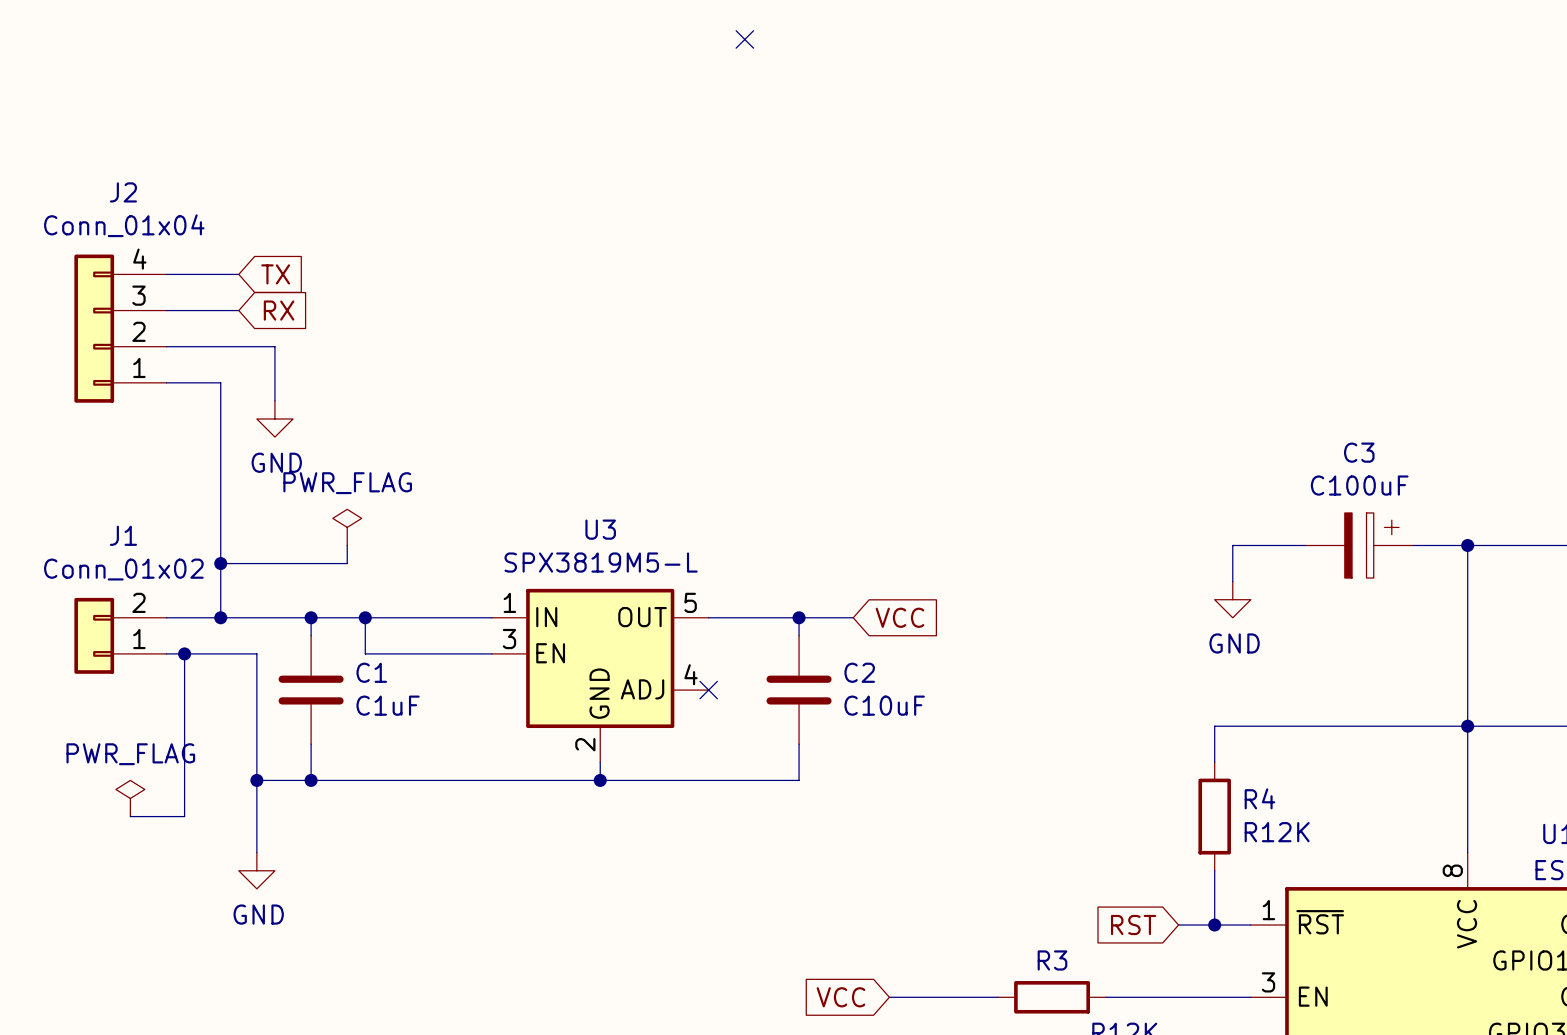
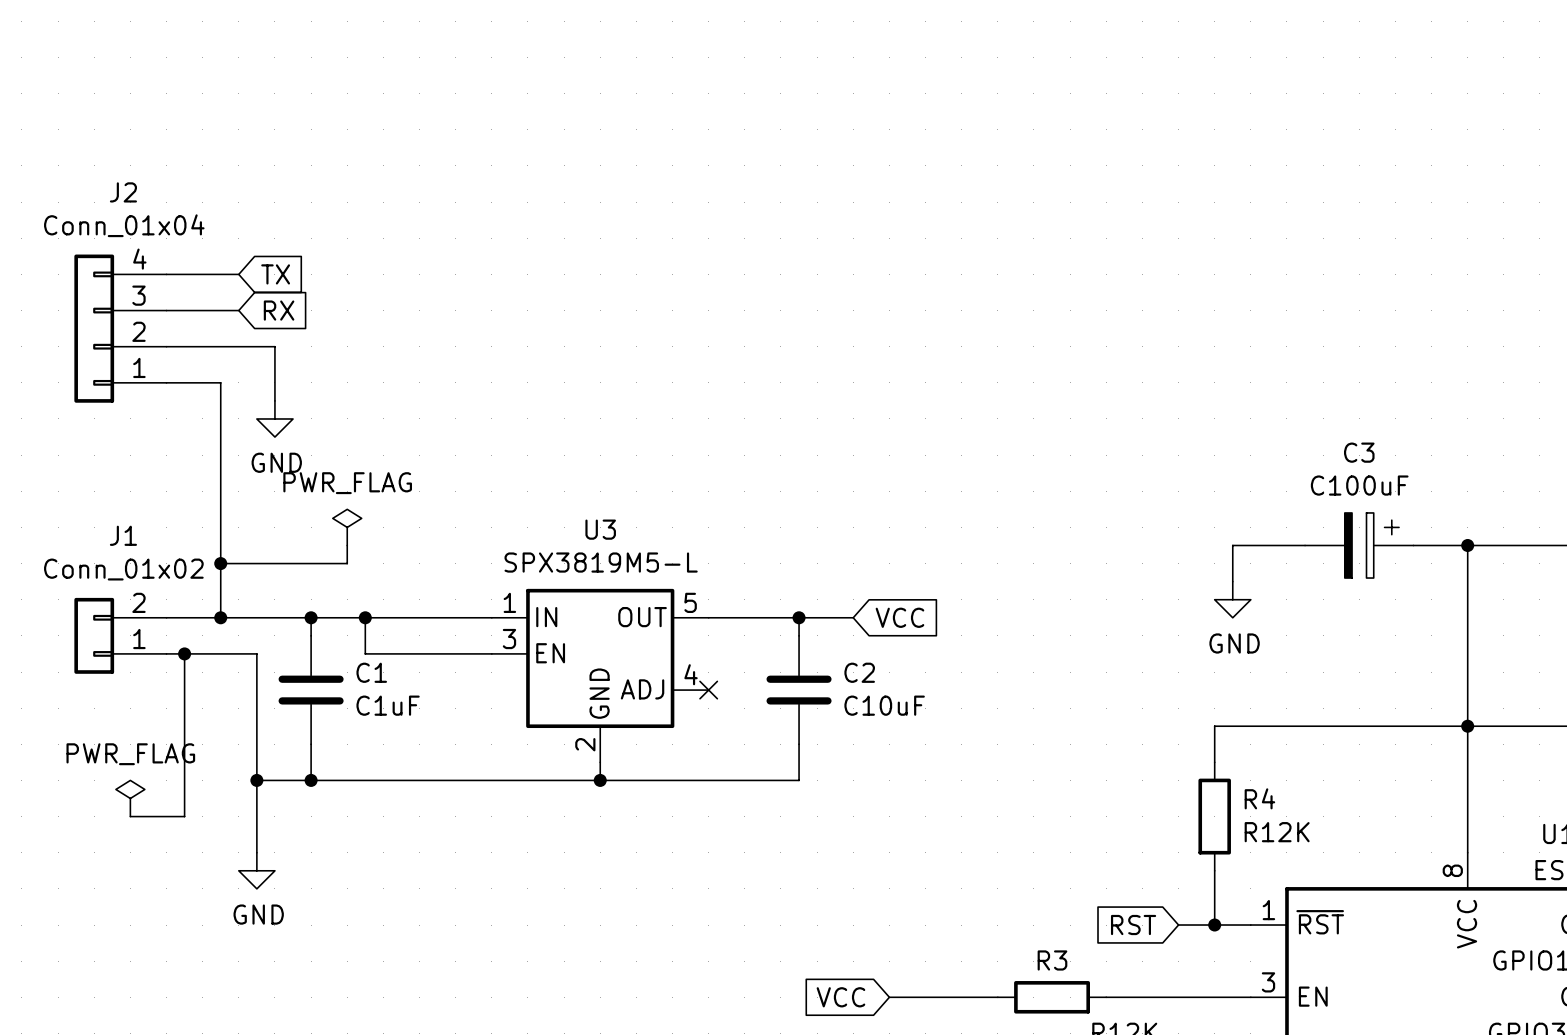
no-connect mark: (744, 39) -> none

